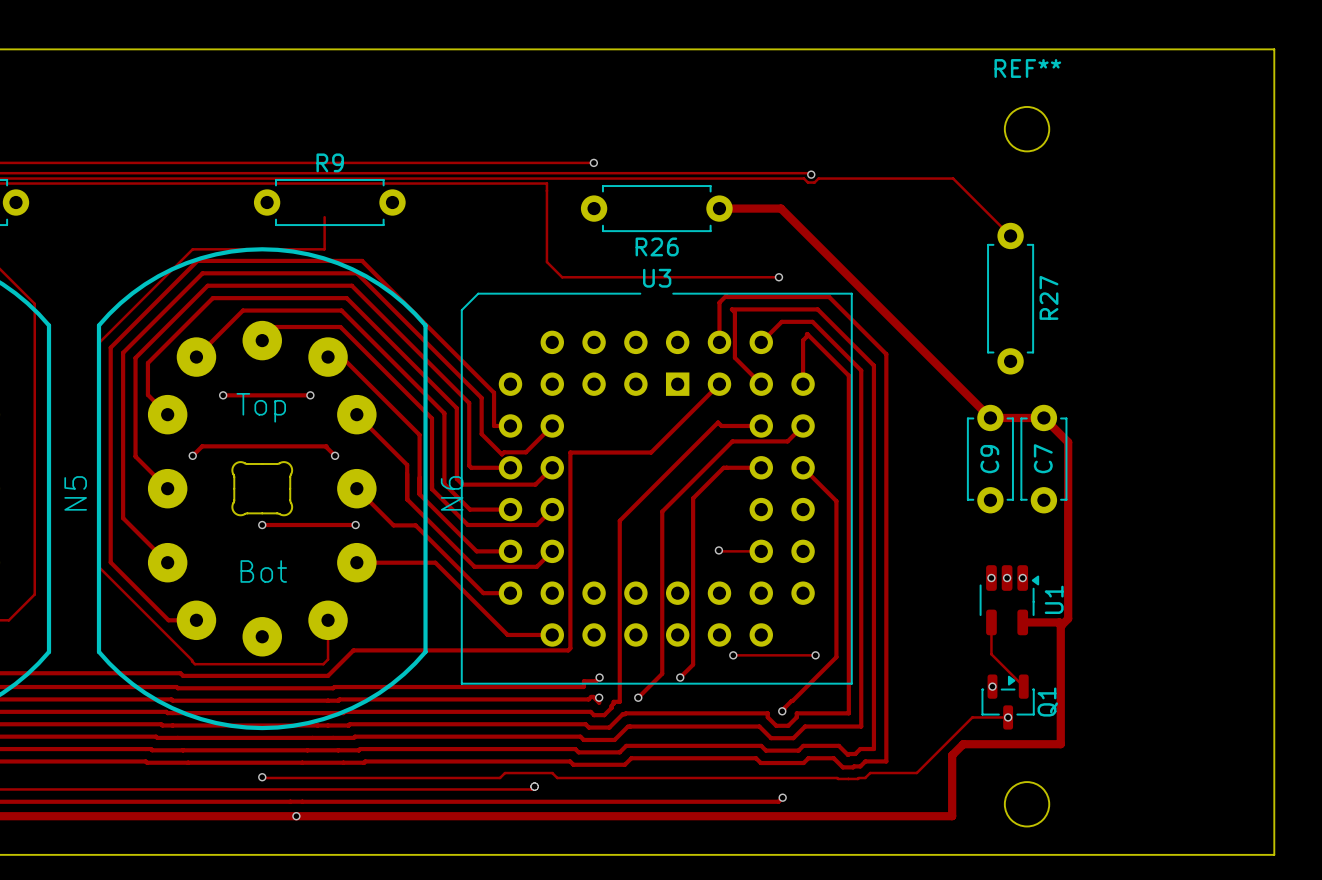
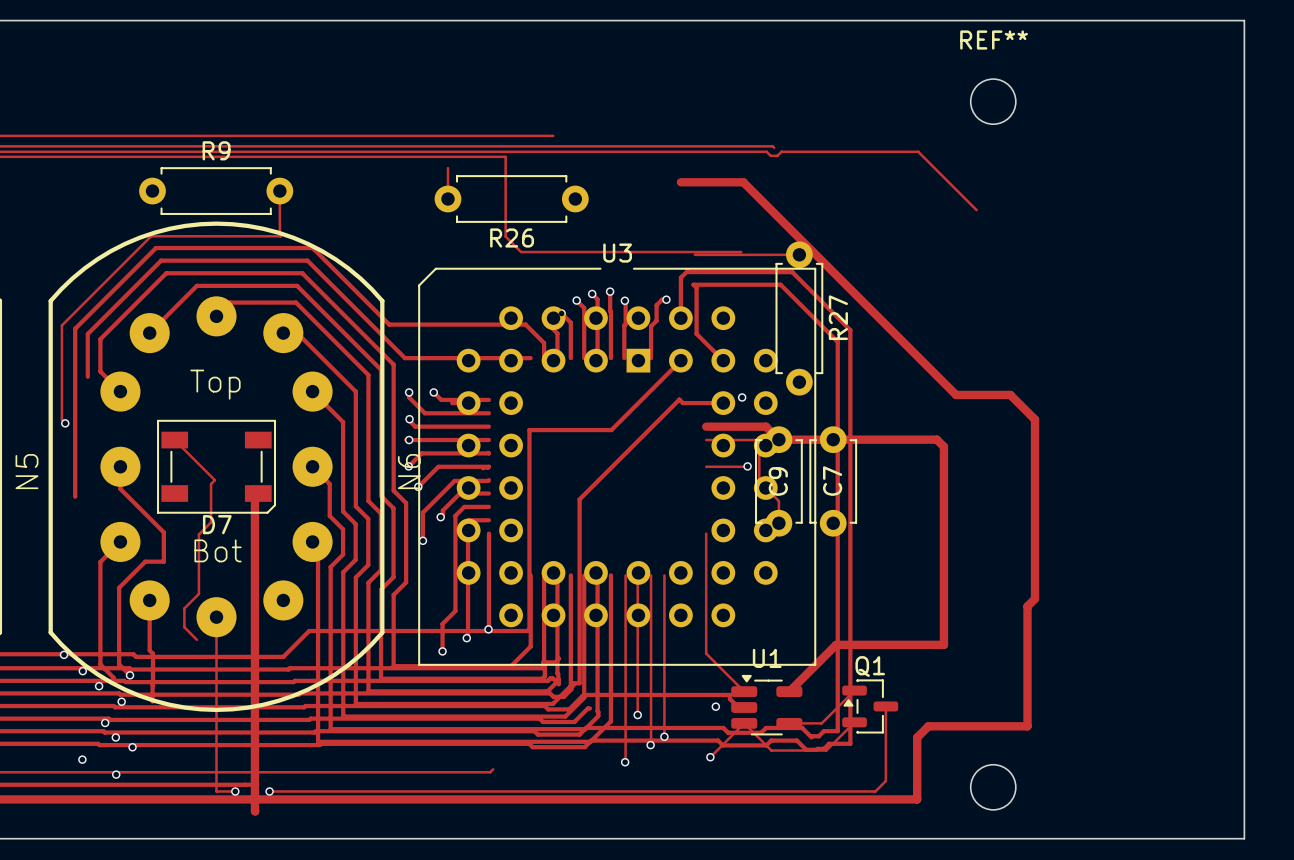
via: (593, 162) -> none
via: (811, 174) -> none
track: none -> (447, 168) (447, 199)
R9 position: (329, 202) -> (216, 191)
R26 position: (656, 208) -> (511, 199)
track: (324, 249) (192, 249) (99, 342) (99, 567) (194, 664) (323, 664) (328, 659) (328, 620) -> (279, 223) (280, 236) (151, 236) (61, 325) (61, 419) (65, 423)
via: (778, 277) -> none
track: none -> (694, 254) (799, 254)
R27 position: (1010, 298) -> (799, 318)
track: none -> (610, 291) (610, 358)
via: none -> (610, 291)
track: none -> (592, 293) (597, 299) (597, 358)
via: none -> (592, 293)
track: none -> (666, 299) (662, 299) (656, 305) (656, 320) (651, 326) (651, 358)
via: none -> (666, 299)
track: none -> (576, 300) (584, 308) (584, 358)
via: none -> (576, 300)
track: none -> (624, 300) (624, 358)
via: none -> (624, 300)
track: none -> (561, 313) (570, 322) (570, 358)
via: none -> (561, 313)
track: (761, 342) (781, 321) (812, 321) (861, 370) (861, 726) (805, 726) (793, 738) (771, 738) (759, 726) (630, 726) -> none
track: (432, 348) (481, 397) (481, 434) (502, 454) (504, 452) (525, 452) (552, 425) -> (389, 324) (525, 324) (544, 343) (544, 358)
track: none -> (548, 324) (557, 333) (557, 358)
track: (447, 381) (469, 403) (469, 465) (471, 467) (510, 467) -> (404, 358) (530, 358)
track: (803, 384) (803, 340) (807, 334) (848, 375) (848, 713) (796, 713) (796, 717) (788, 725) -> none
track: (436, 388) (456, 408) (456, 478) (462, 484) (535, 484) (552, 467) -> (393, 364) (393, 490) (406, 503) (406, 582) (393, 594) (393, 666) (511, 666) (530, 646) (530, 575)
track: (424, 393) (444, 413) (444, 484) (470, 509) (510, 509) -> (381, 369) (381, 495) (393, 508) (393, 577) (381, 589) (381, 678) (542, 678) (544, 676) (544, 575)
track: (223, 395) (310, 395) -> none
via: (223, 395) -> none
via: (310, 395) -> none
track: (411, 398) (432, 418) (432, 489) (467, 525) (536, 525) (552, 509) -> (368, 375) (368, 501) (380, 513) (380, 570) (368, 582) (368, 691) (547, 691) (558, 680) (557, 575)
track: (135, 400) (135, 456) (167, 488) -> (129, 675) (119, 664) (119, 587) (145, 561) (163, 561) (163, 532) (120, 489) (120, 466)
track: (399, 414) (419, 434) (419, 494) (476, 551) (510, 551) -> (355, 391) (355, 506) (368, 518) (368, 565) (355, 577) (355, 703) (552, 703) (570, 685) (570, 575)
track: none -> (409, 392) (409, 397) (424, 413) (488, 413)
via: none -> (409, 392)
track: none -> (433, 392) (441, 399) (488, 399)
via: none -> (433, 392)
via: none -> (742, 397)
track: (494, 425) (494, 392) (362, 260) (197, 260) (110, 347) (110, 562) (168, 620) (196, 620) -> (152, 701) (152, 653) (149, 650) (149, 600)
track: (803, 425) (787, 441) (732, 441) (662, 511) (662, 673) (638, 697) -> none
track: none -> (409, 419) (415, 426) (488, 426)
via: none -> (409, 419)
track: (386, 444) (407, 465) (407, 499) (474, 566) (536, 566) (552, 551) -> (343, 422) (343, 511) (355, 524) (355, 559) (343, 572) (343, 716) (565, 716) (584, 697) (584, 575)
via: none -> (65, 423)
track: none -> (706, 426) (765, 426) (778, 439) (936, 439) (943, 446) (943, 644) (836, 644) (789, 691)
track: (192, 455) (202, 446) (326, 446) (335, 455) -> none
via: (192, 455) -> none
via: (335, 455) -> none
C9 position: (990, 459) -> (778, 481)
C7 position: (1043, 459) -> (833, 481)
track: none -> (406, 439) (488, 440)
track: none -> (174, 440) (214, 480) (211, 484) (211, 522) (198, 534) (198, 593) (184, 608) (184, 627) (196, 639)
via: none -> (409, 440)
track: none -> (706, 440) (757, 440) (759, 438) (759, 481) (778, 501) (778, 523)
track: (761, 467) (723, 467) (693, 498) (693, 664) (680, 677) -> none
track: (803, 467) (836, 501) (836, 657) (782, 711) -> none
track: none -> (488, 452) (421, 453) (408, 466)
part: (262, 488) -> none
D7: none -> (216, 466)
via: none -> (408, 466)
track: none -> (747, 466) (706, 466)
via: none -> (747, 466)
track: none -> (482, 468) (488, 466) (438, 466) (418, 486)
track: none -> (488, 480) (454, 480) (422, 512) (422, 540)
track: (373, 505) (393, 525) (415, 525) (483, 593) (510, 593) -> (329, 483) (329, 515) (343, 529) (343, 554) (330, 567) (330, 729) (585, 729) (598, 716) (597, 575)
via: none -> (418, 486)
track: none -> (258, 493) (254, 496) (255, 811)
track: none -> (488, 493) (459, 493) (442, 510) (440, 517)
track: (123, 518) (167, 562) -> (113, 679) (100, 664) (100, 561) (120, 541)
track: (262, 525) (355, 525) -> none
via: (262, 525) -> none
via: (355, 525) -> none
track: none -> (488, 506) (464, 506) (455, 515) (455, 611) (442, 623) (442, 651)
via: none -> (440, 517)
track: none -> (488, 520) (468, 521) (466, 638)
track: (718, 550) (761, 551) -> none
via: (718, 550) -> none
track: none -> (488, 533) (488, 629)
track: none -> (706, 533) (706, 653) (744, 691)
via: none -> (422, 540)
track: (356, 562) (435, 562) (507, 634) (552, 634) -> (312, 541) (318, 547) (318, 741) (590, 741) (610, 721) (610, 575)
via: (991, 578) -> none
via: (1007, 578) -> none
via: (1022, 578) -> none
track: none -> (625, 575) (625, 762)
track: none -> (637, 575) (637, 715)
track: none -> (651, 575) (650, 745)
track: none -> (664, 575) (664, 736)
U1 rotation: 0° (1009, 600) -> 90° counterclockwise (766, 705)
U1 position: (1009, 600) -> (766, 705)
track: (991, 622) (991, 654) (1023, 686) -> none
track: (1022, 622) (1059, 622) (1062, 624) -> none
track: none -> (216, 617) (216, 791) (235, 791)
via: none -> (488, 629)
track: (733, 655) (815, 655) -> none
via: (733, 655) -> none
via: (815, 655) -> none
via: none -> (466, 638)
via: none -> (442, 651)
via: none -> (64, 654)
via: (599, 677) -> none
via: (680, 677) -> none
via: (992, 686) -> none
via: none -> (82, 671)
via: none -> (130, 675)
via: (599, 697) -> none
via: (638, 697) -> none
Q1 rotation: 0° (1008, 702) -> 90° counterclockwise (870, 706)
Q1 position: (1008, 702) -> (870, 706)
via: none -> (99, 686)
track: none -> (854, 690) (821, 723) (789, 723)
via position: (782, 711) -> (715, 706)
track: (1008, 717) (972, 717) (916, 773) (870, 773) (865, 778) (857, 778) (557, 778) (552, 773) (504, 773) (500, 778) (262, 777) -> none
via: (1008, 717) -> none
via: none -> (121, 701)
track: none -> (885, 706) (885, 781) (875, 791) (269, 791)
via: none -> (637, 715)
via: none -> (105, 722)
track: none -> (854, 722) (826, 750) (771, 750) (744, 723) (710, 757)
via: none -> (664, 736)
via: none -> (115, 737)
via: none -> (650, 745)
via: none -> (132, 747)
via: none -> (710, 757)
via: none -> (82, 759)
via: (262, 777) -> none
via: none -> (625, 762)
via: (534, 786) -> none
via: none -> (116, 774)
track: (782, 797) (778, 801) (302, 801) -> none
via: (782, 797) -> none
via: none -> (235, 791)
via: none -> (269, 791)
via: (296, 816) -> none

